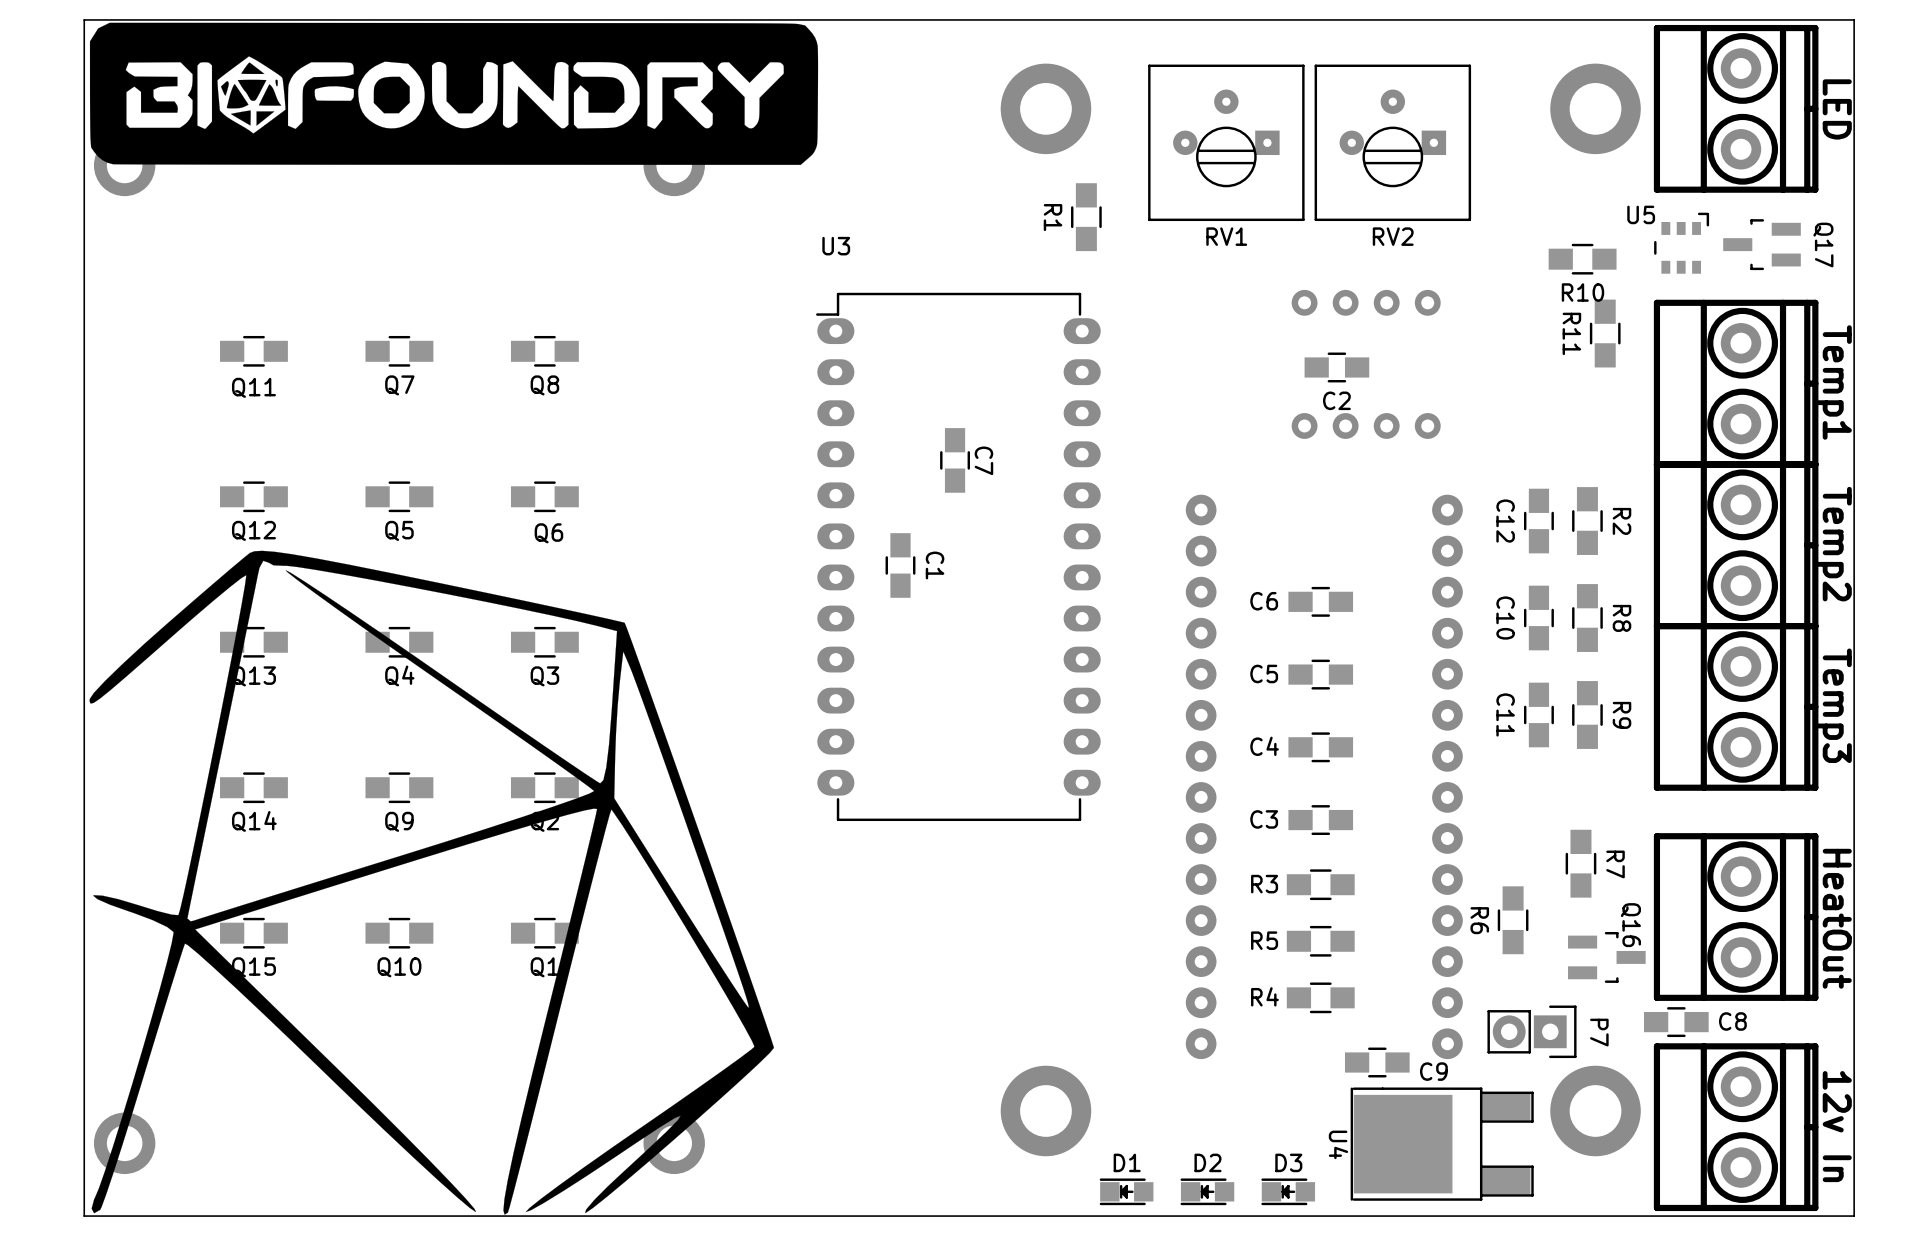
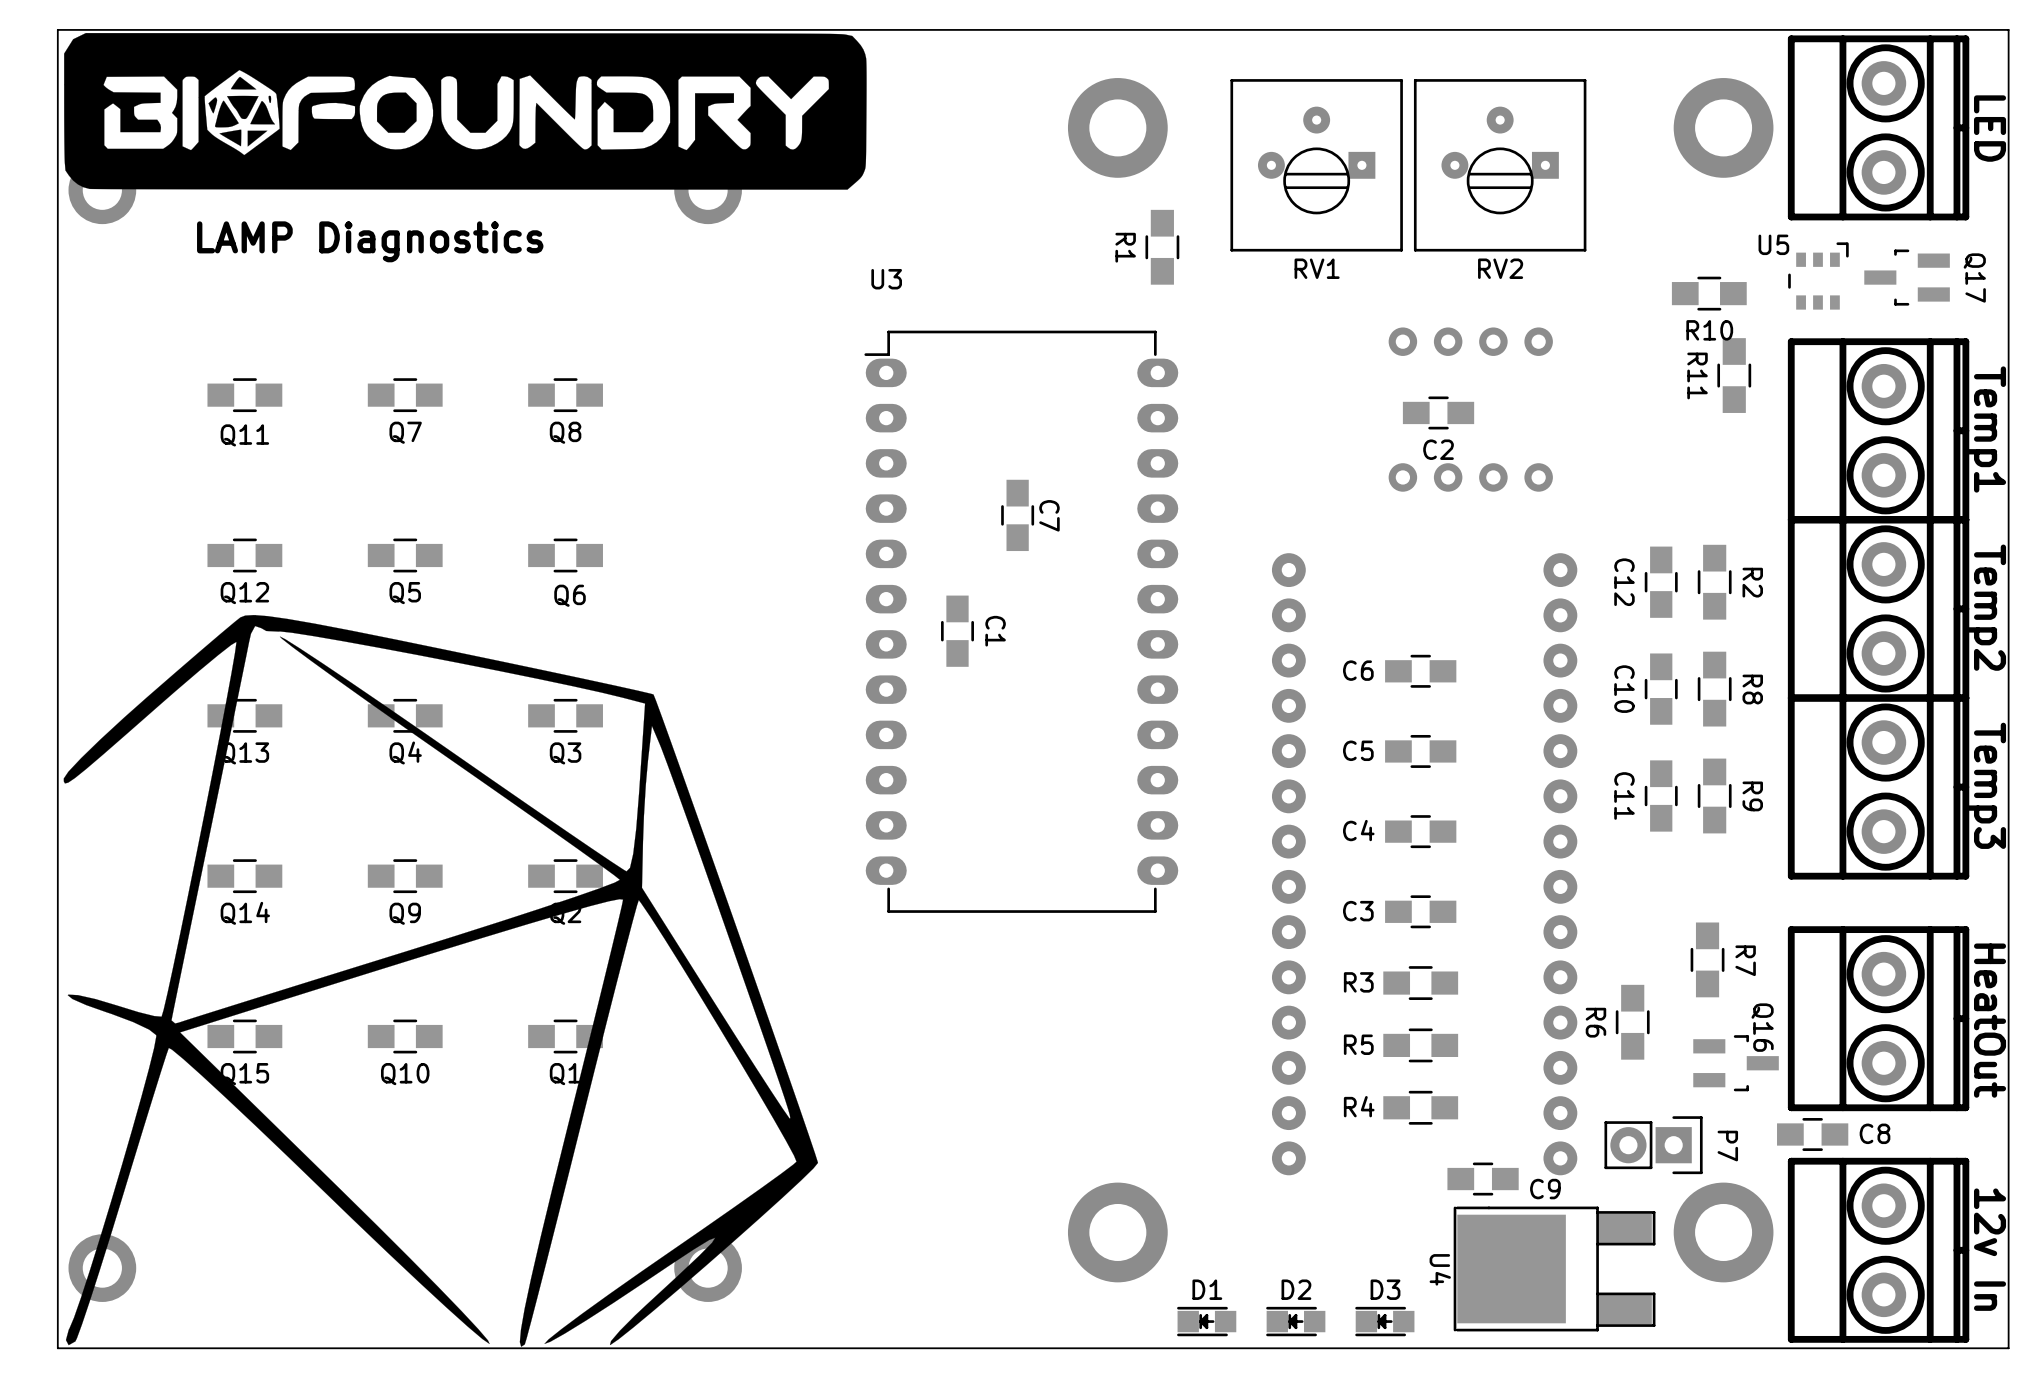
text: none -> LAMP Diagnostics (370, 241)

